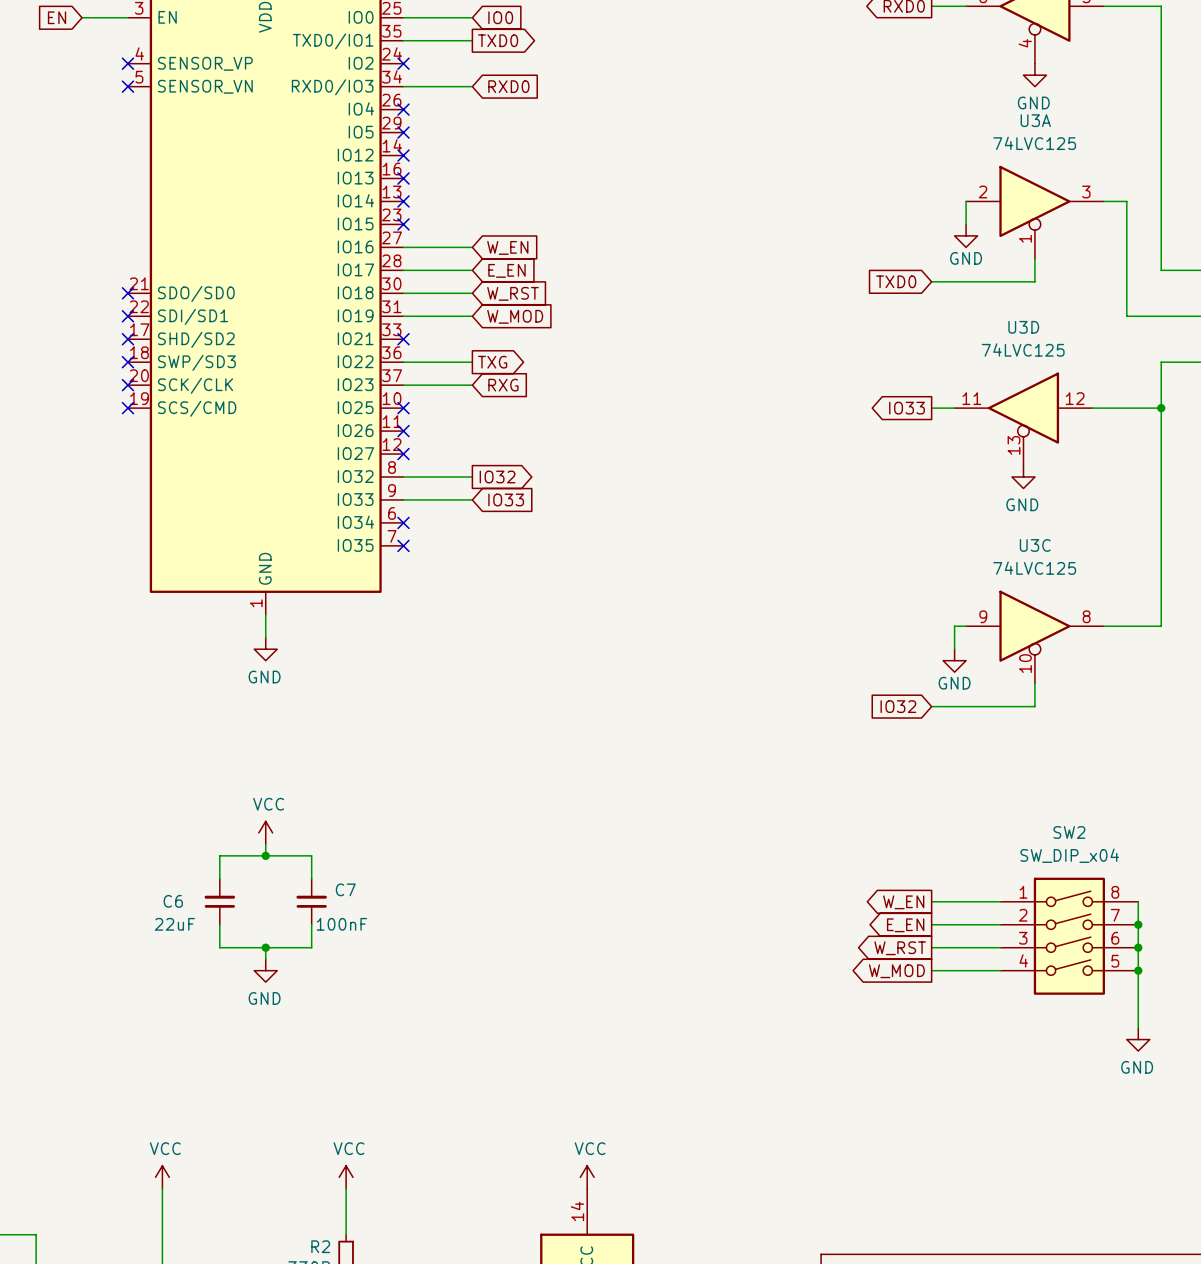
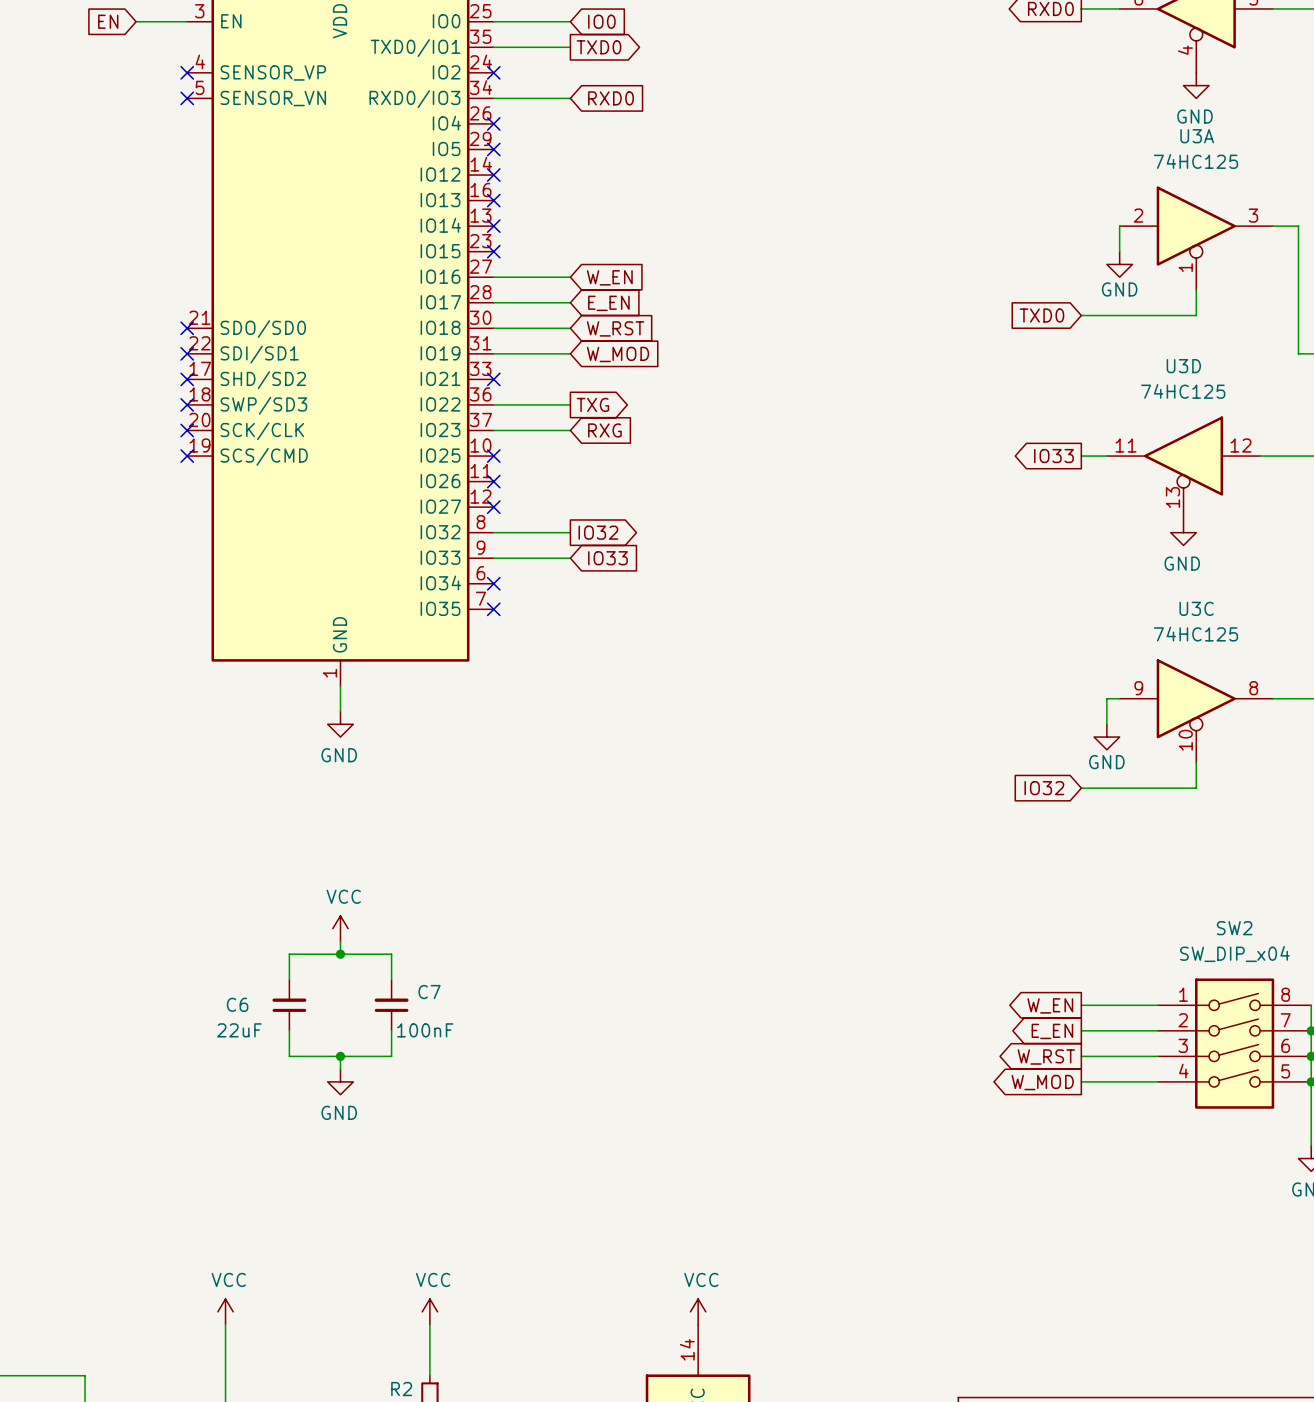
U3A value: 74LVC125 (1034, 143) -> 74HC125 (1195, 161)
U3D value: 74LVC125 (1023, 350) -> 74HC125 (1183, 391)
U3C value: 74LVC125 (1034, 568) -> 74HC125 (1195, 634)

